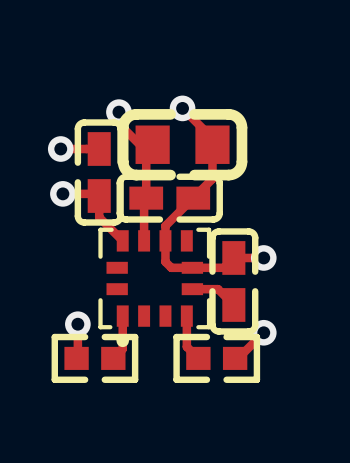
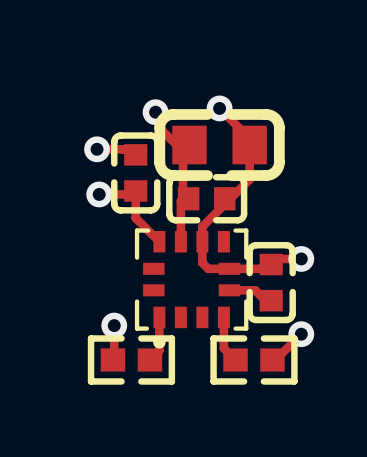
part footprint: [74, 119, 124, 226] -> [111, 132, 161, 214]
part footprint: [116, 173, 223, 223] -> [166, 174, 248, 224]
part footprint: [209, 228, 259, 335] -> [246, 241, 296, 324]

